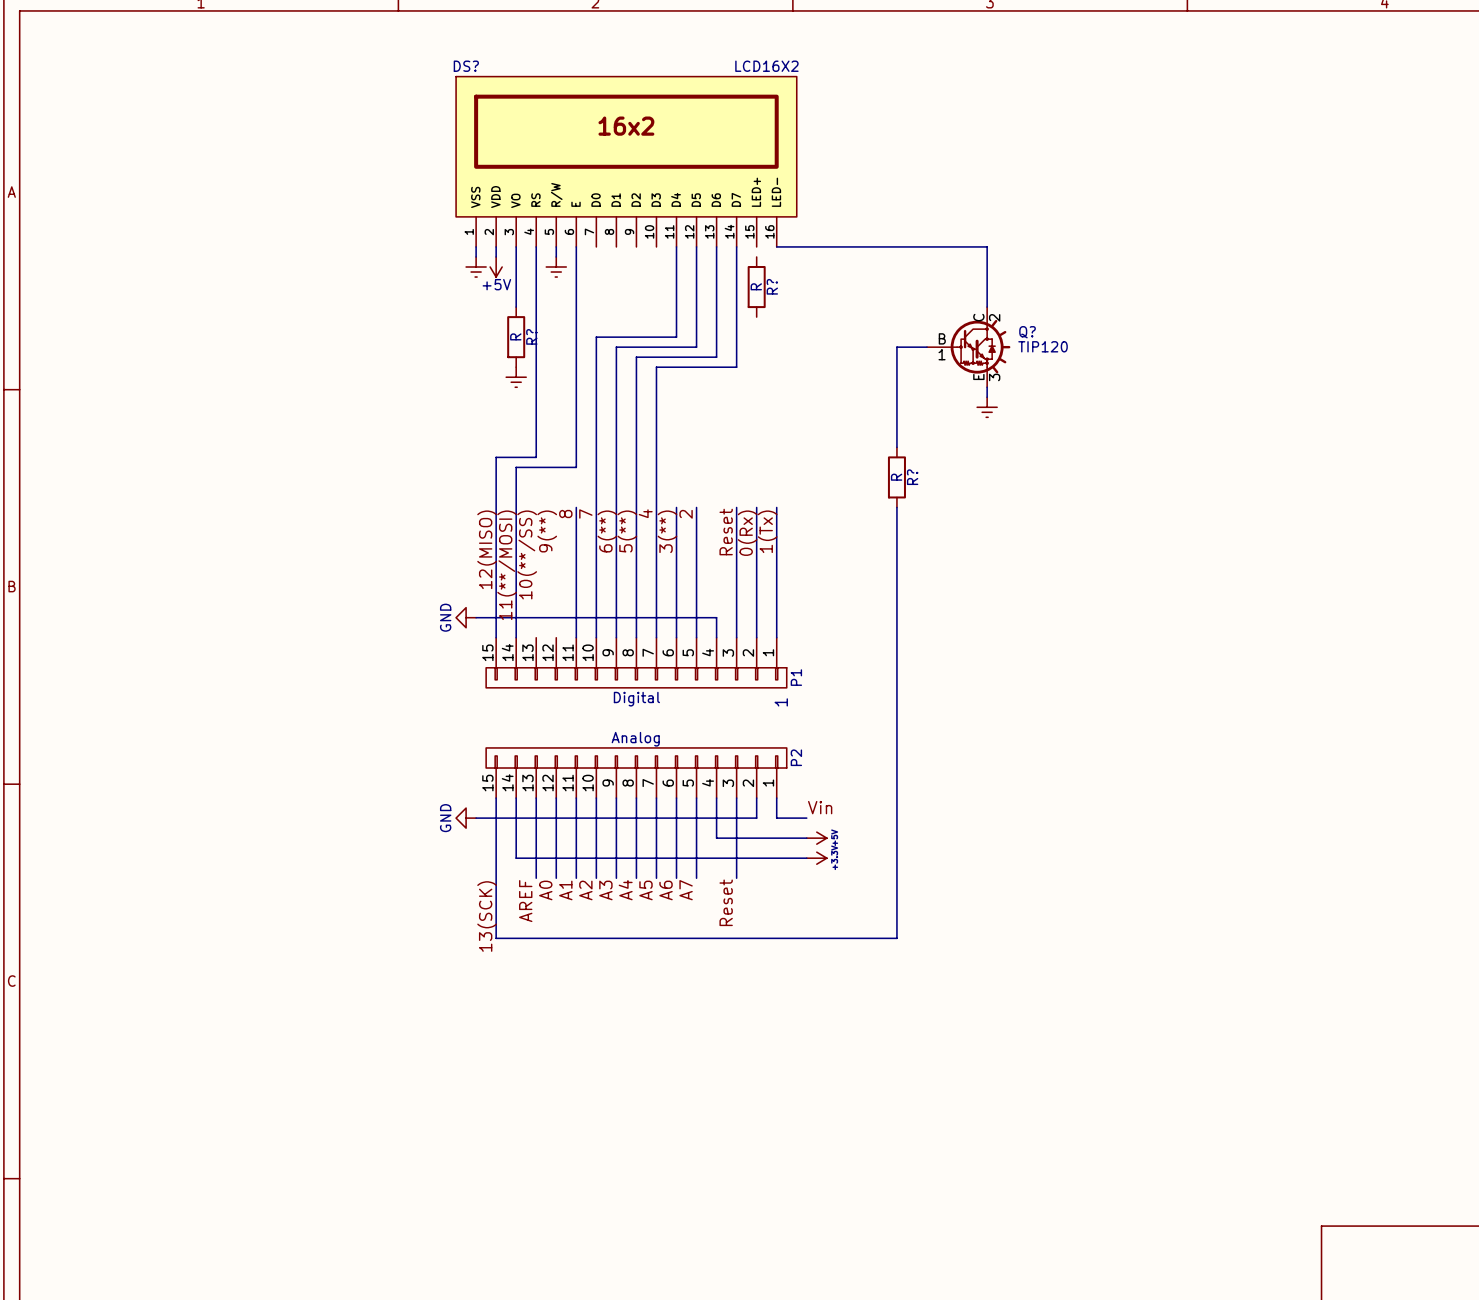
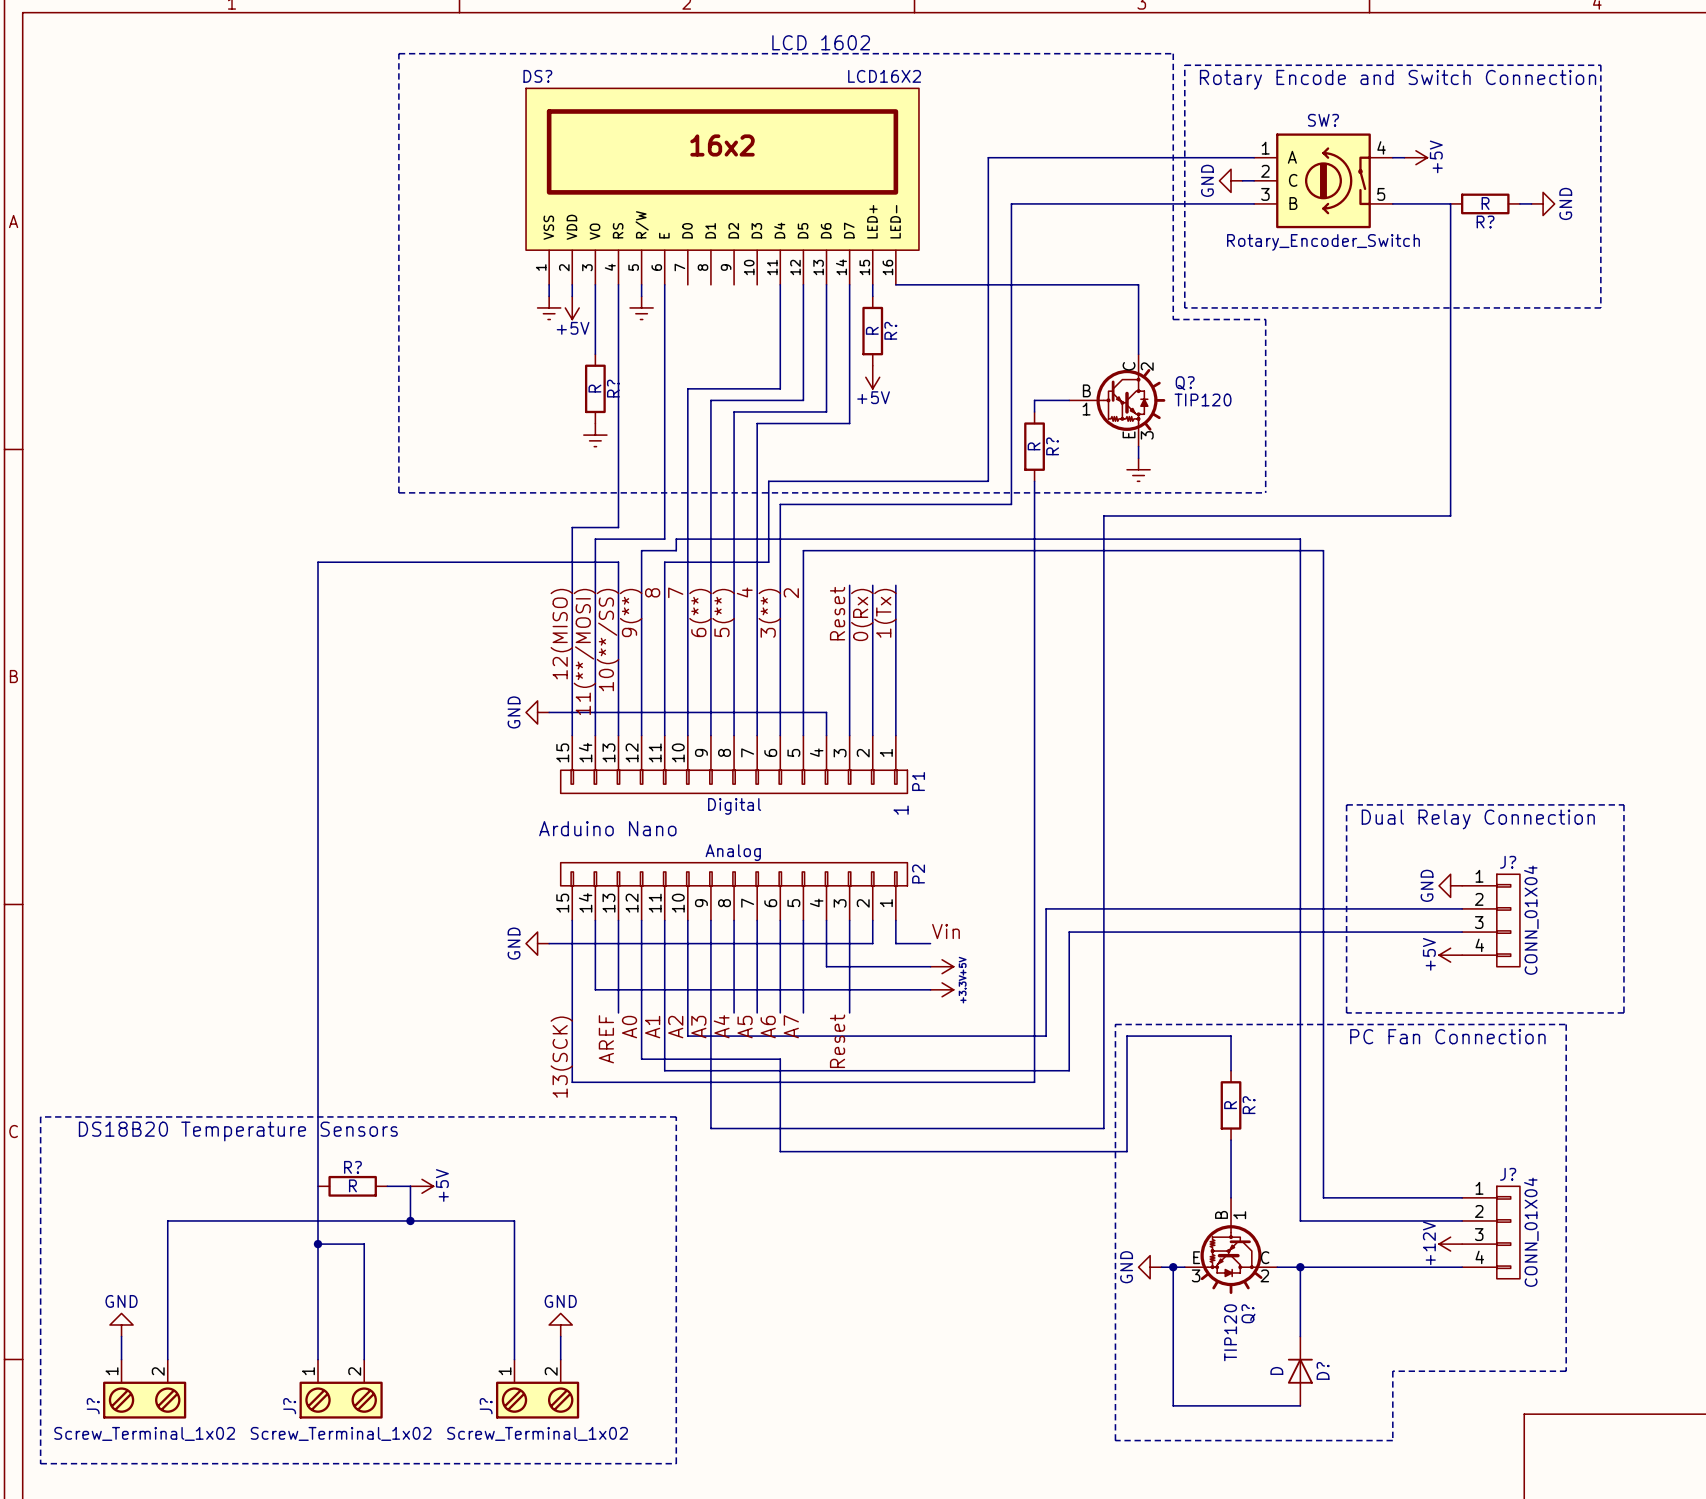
text: none -> LCD 1602 (821, 42)
line: none -> (398, 53) (398, 492) (1265, 492) (1265, 319) (1173, 319) (1173, 53) (398, 53)
line: none -> (1184, 65) (1184, 307) (1600, 307) (1600, 65) (1184, 65)
text: none -> Rotary Encode and Switch Connection (1398, 79)
wire: none -> (1254, 157) (988, 157) (988, 481) (768, 481) (768, 562) (664, 562) (664, 585)
wire: none -> (1392, 157) (1404, 157)
power symbol: none -> +5V (1415, 157)
power symbol: none -> GND (1231, 180)
wire: none -> (1242, 180) (1254, 180)
SW?: none -> Rotary_Encoder_Switch (1323, 180)
wire: none -> (1254, 203) (1011, 203) (1011, 504) (780, 504) (780, 585)
wire: none -> (1392, 203) (1450, 203) (1450, 515) (1103, 515) (1103, 1128) (710, 1128) (710, 1012)
R?: none -> R (1485, 203)
wire: none -> (1519, 203) (1531, 203)
power symbol: none -> GND (1543, 203)
wire: none -> (872, 284) (872, 296)
power symbol: none -> +5V (872, 377)
wire: (896, 357) (896, 417) -> (1034, 515) (1034, 585)
R? position: (896, 477) -> (1034, 446)
wire: none -> (803, 585) (803, 550) (1323, 550) (1323, 1197) (1462, 1197)
wire: none -> (618, 735) (618, 562) (318, 562) (318, 1359)
wire: none -> (641, 735) (641, 550) (676, 550) (676, 539) (1300, 539) (1300, 1220) (1462, 1220)
line: none -> (1346, 804) (1346, 1012) (1623, 1012) (1623, 804) (1346, 804)
text: none -> Dual Relay Connection (1478, 819)
text: none -> Arduino Nano (607, 828)
power symbol: none -> GND (1450, 885)
wire: none -> (1462, 908) (1046, 908) (1046, 1036) (687, 1036) (687, 1012)
J?: none -> CONN_01X04 (1491, 920)
wire: none -> (1462, 932) (1069, 932) (1069, 1070) (664, 1070) (664, 1012)
power symbol: none -> +5V (1450, 955)
wire: none -> (641, 1012) (641, 1059) (780, 1059) (780, 1151) (1127, 1151) (1127, 1036) (1231, 1036) (1231, 1070)
line: none -> (1115, 1024) (1115, 1440) (1392, 1440) (1392, 1371) (1566, 1371) (1566, 1024) (1115, 1024)
text: none -> PC Fan Connection (1447, 1036)
R?: none -> R (1231, 1105)
line: none -> (40, 1116) (676, 1116) (676, 1463) (40, 1463) (40, 1116)
text: none -> DS18B20 Temperature Sensors (238, 1131)
wire: none -> (1231, 1140) (1231, 1197)
R?: none -> R (352, 1186)
wire: none -> (387, 1186) (410, 1186) (410, 1220)
power symbol: none -> +5V (422, 1186)
junction: none -> (410, 1220)
J?: none -> CONN_01X04 (1491, 1232)
wire: none -> (318, 1244) (364, 1244) (364, 1359)
junction: none -> (318, 1244)
power symbol: none -> +12V (1450, 1244)
Q?: none -> TIP120 (1231, 1245)
power symbol: none -> GND (1150, 1267)
wire: none -> (1161, 1267) (1184, 1267)
wire: none -> (1173, 1267) (1173, 1405) (1300, 1405)
junction: none -> (1173, 1267)
wire: none -> (1277, 1267) (1462, 1267)
wire: none -> (1300, 1267) (1300, 1336)
junction: none -> (1300, 1267)
power symbol: none -> GND (121, 1324)
power symbol: none -> GND (560, 1324)
wire: none -> (121, 1336) (121, 1359)
wire: none -> (560, 1336) (560, 1359)
wire: none -> (167, 1359) (167, 1220) (514, 1220) (514, 1359)
D?: none -> D (1300, 1371)
J?: none -> Screw_Terminal_1x02 (144, 1389)
J?: none -> Screw_Terminal_1x02 (341, 1389)
J?: none -> Screw_Terminal_1x02 (537, 1389)

